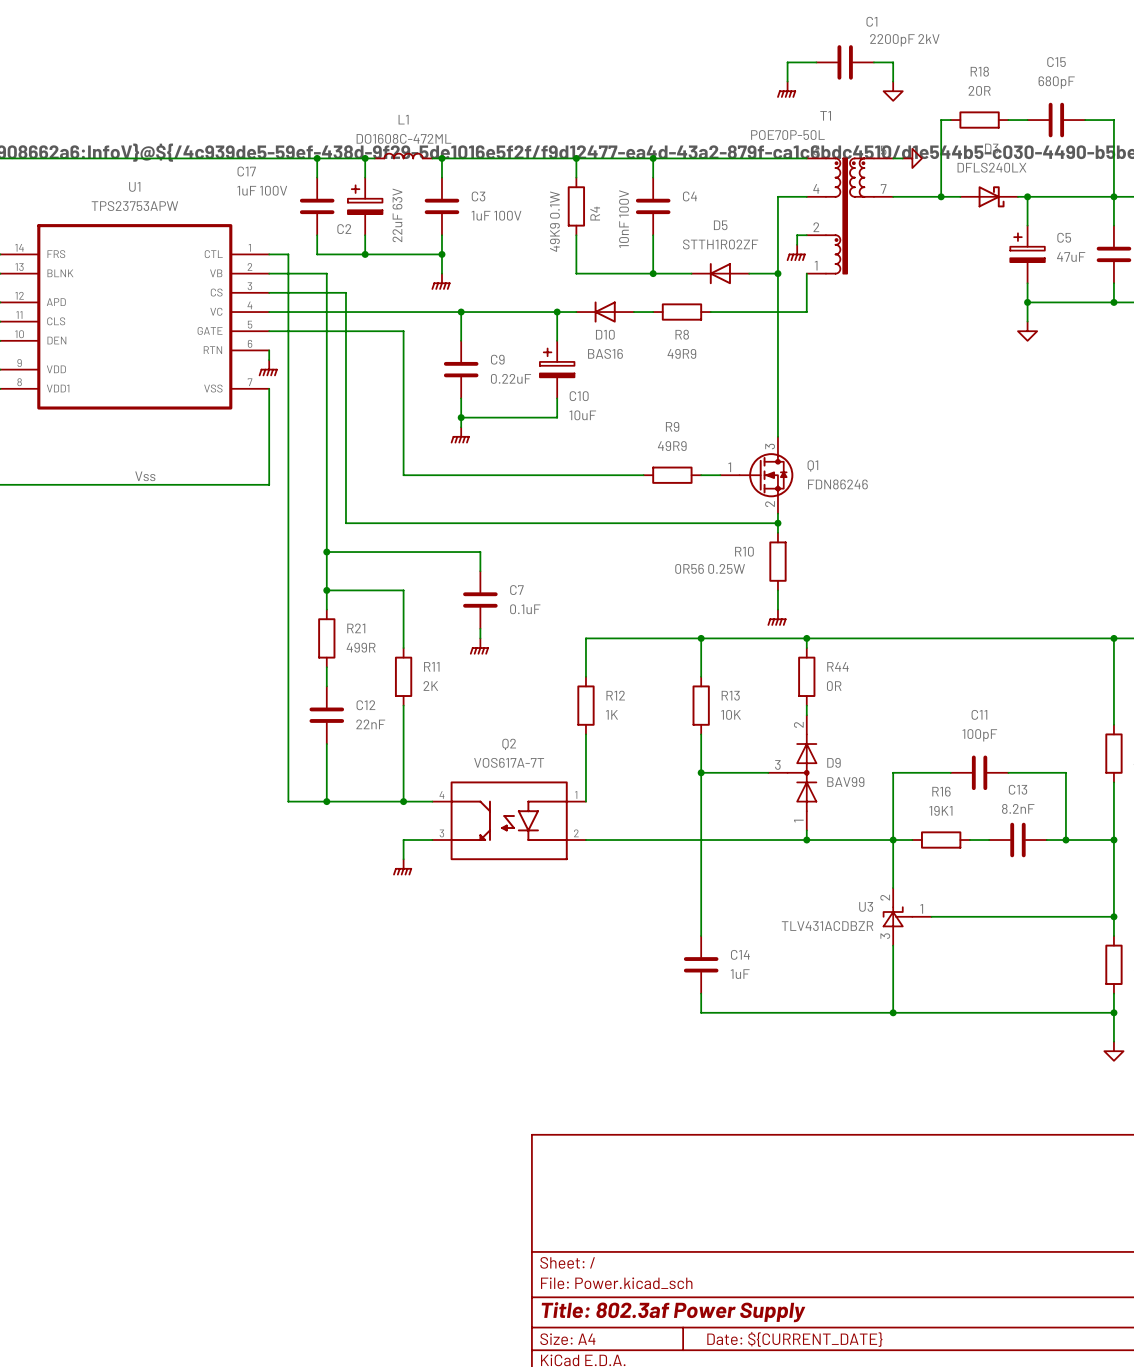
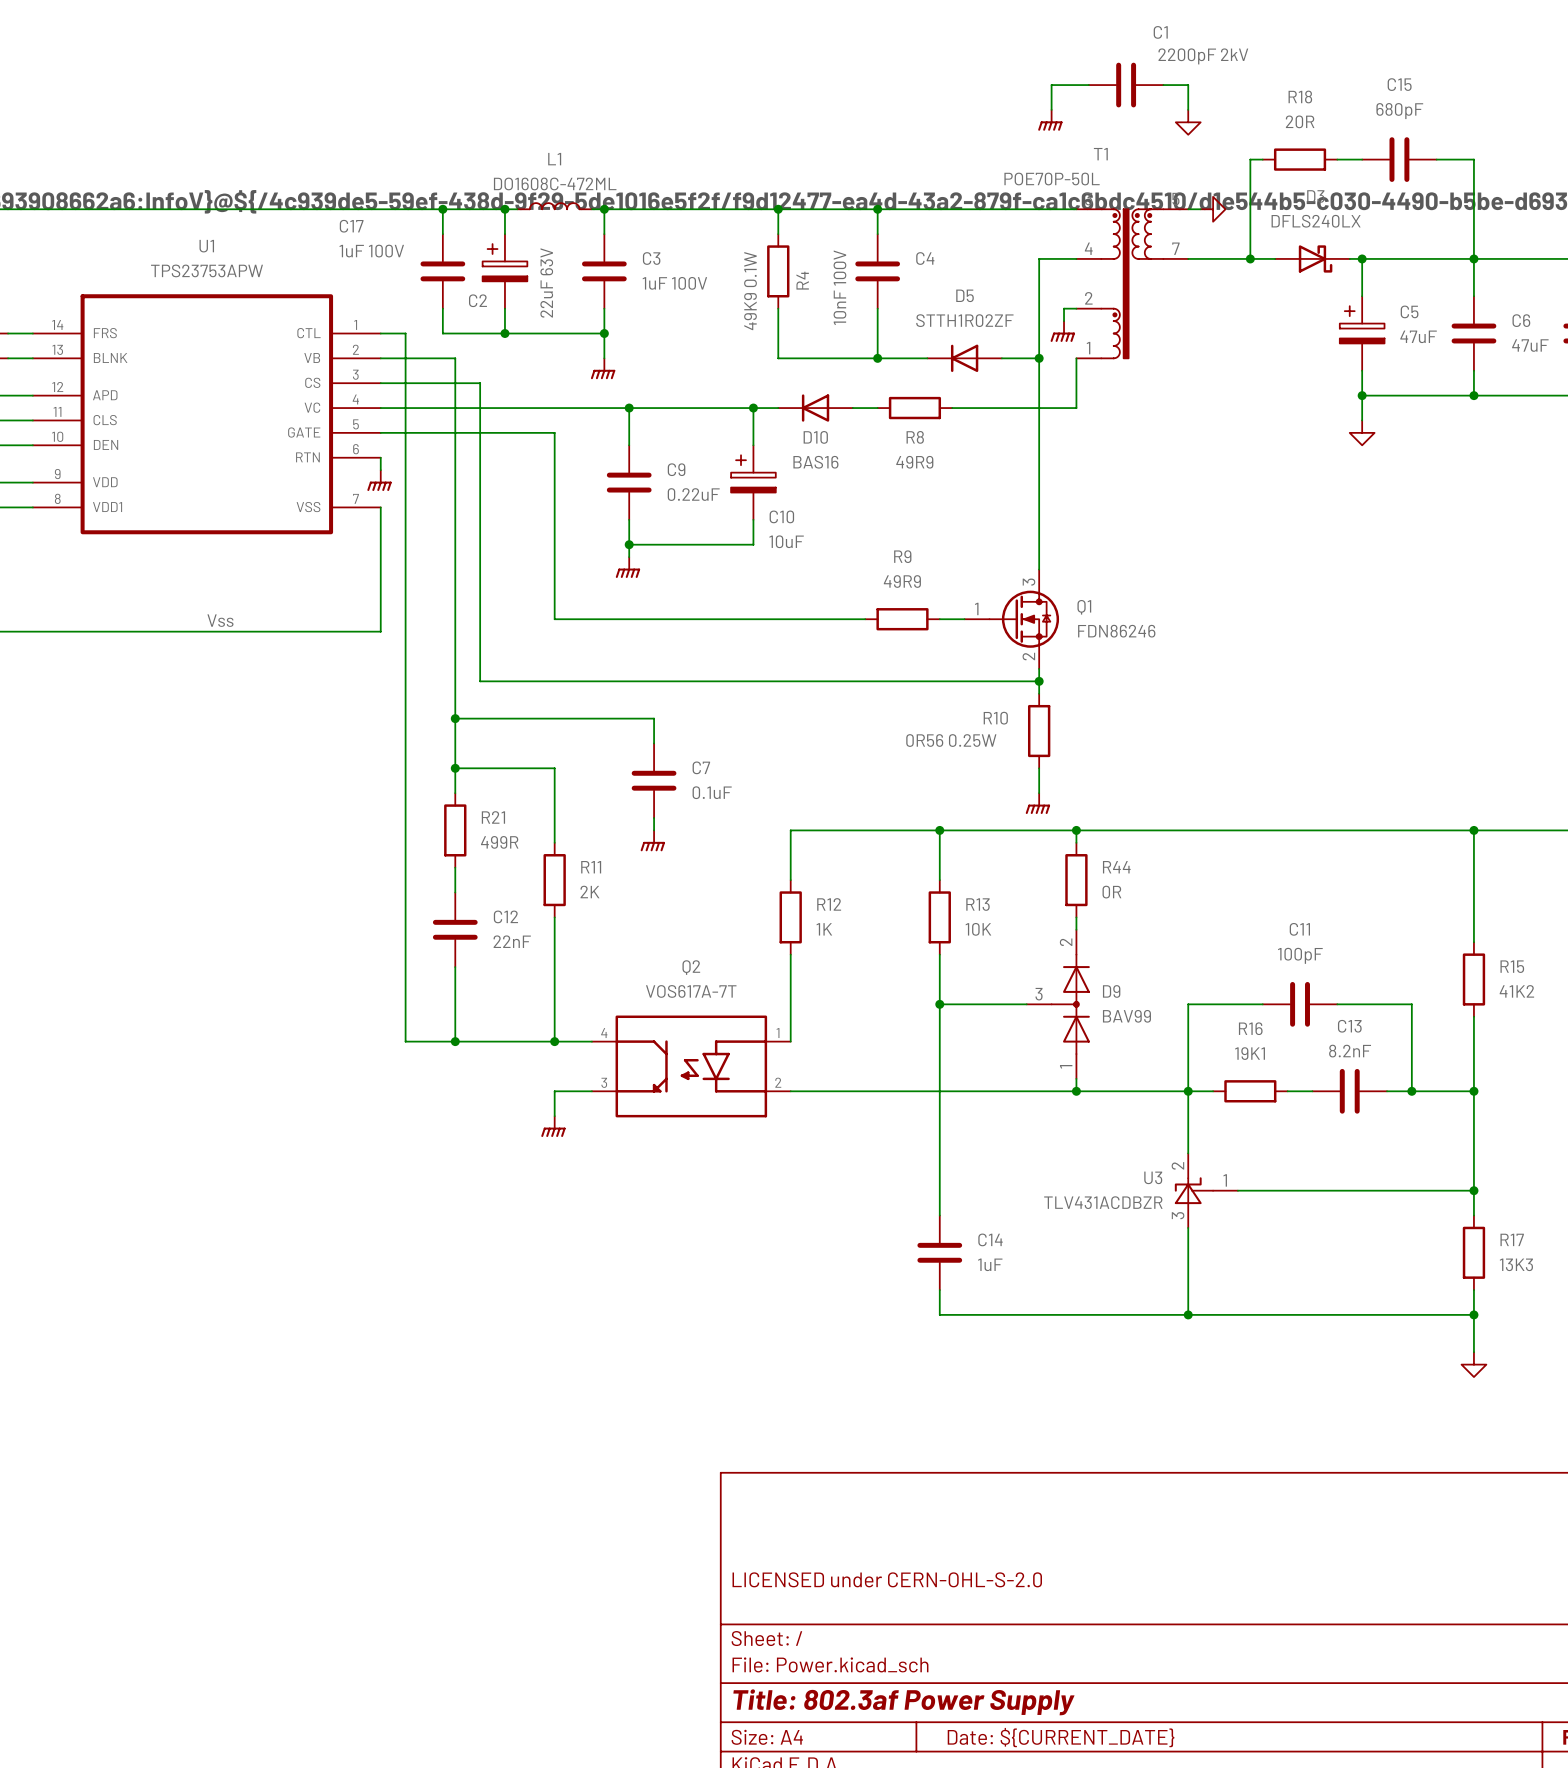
title block: none -> LICENSED under CERN-OHL-S-2.0 (887, 1579)

